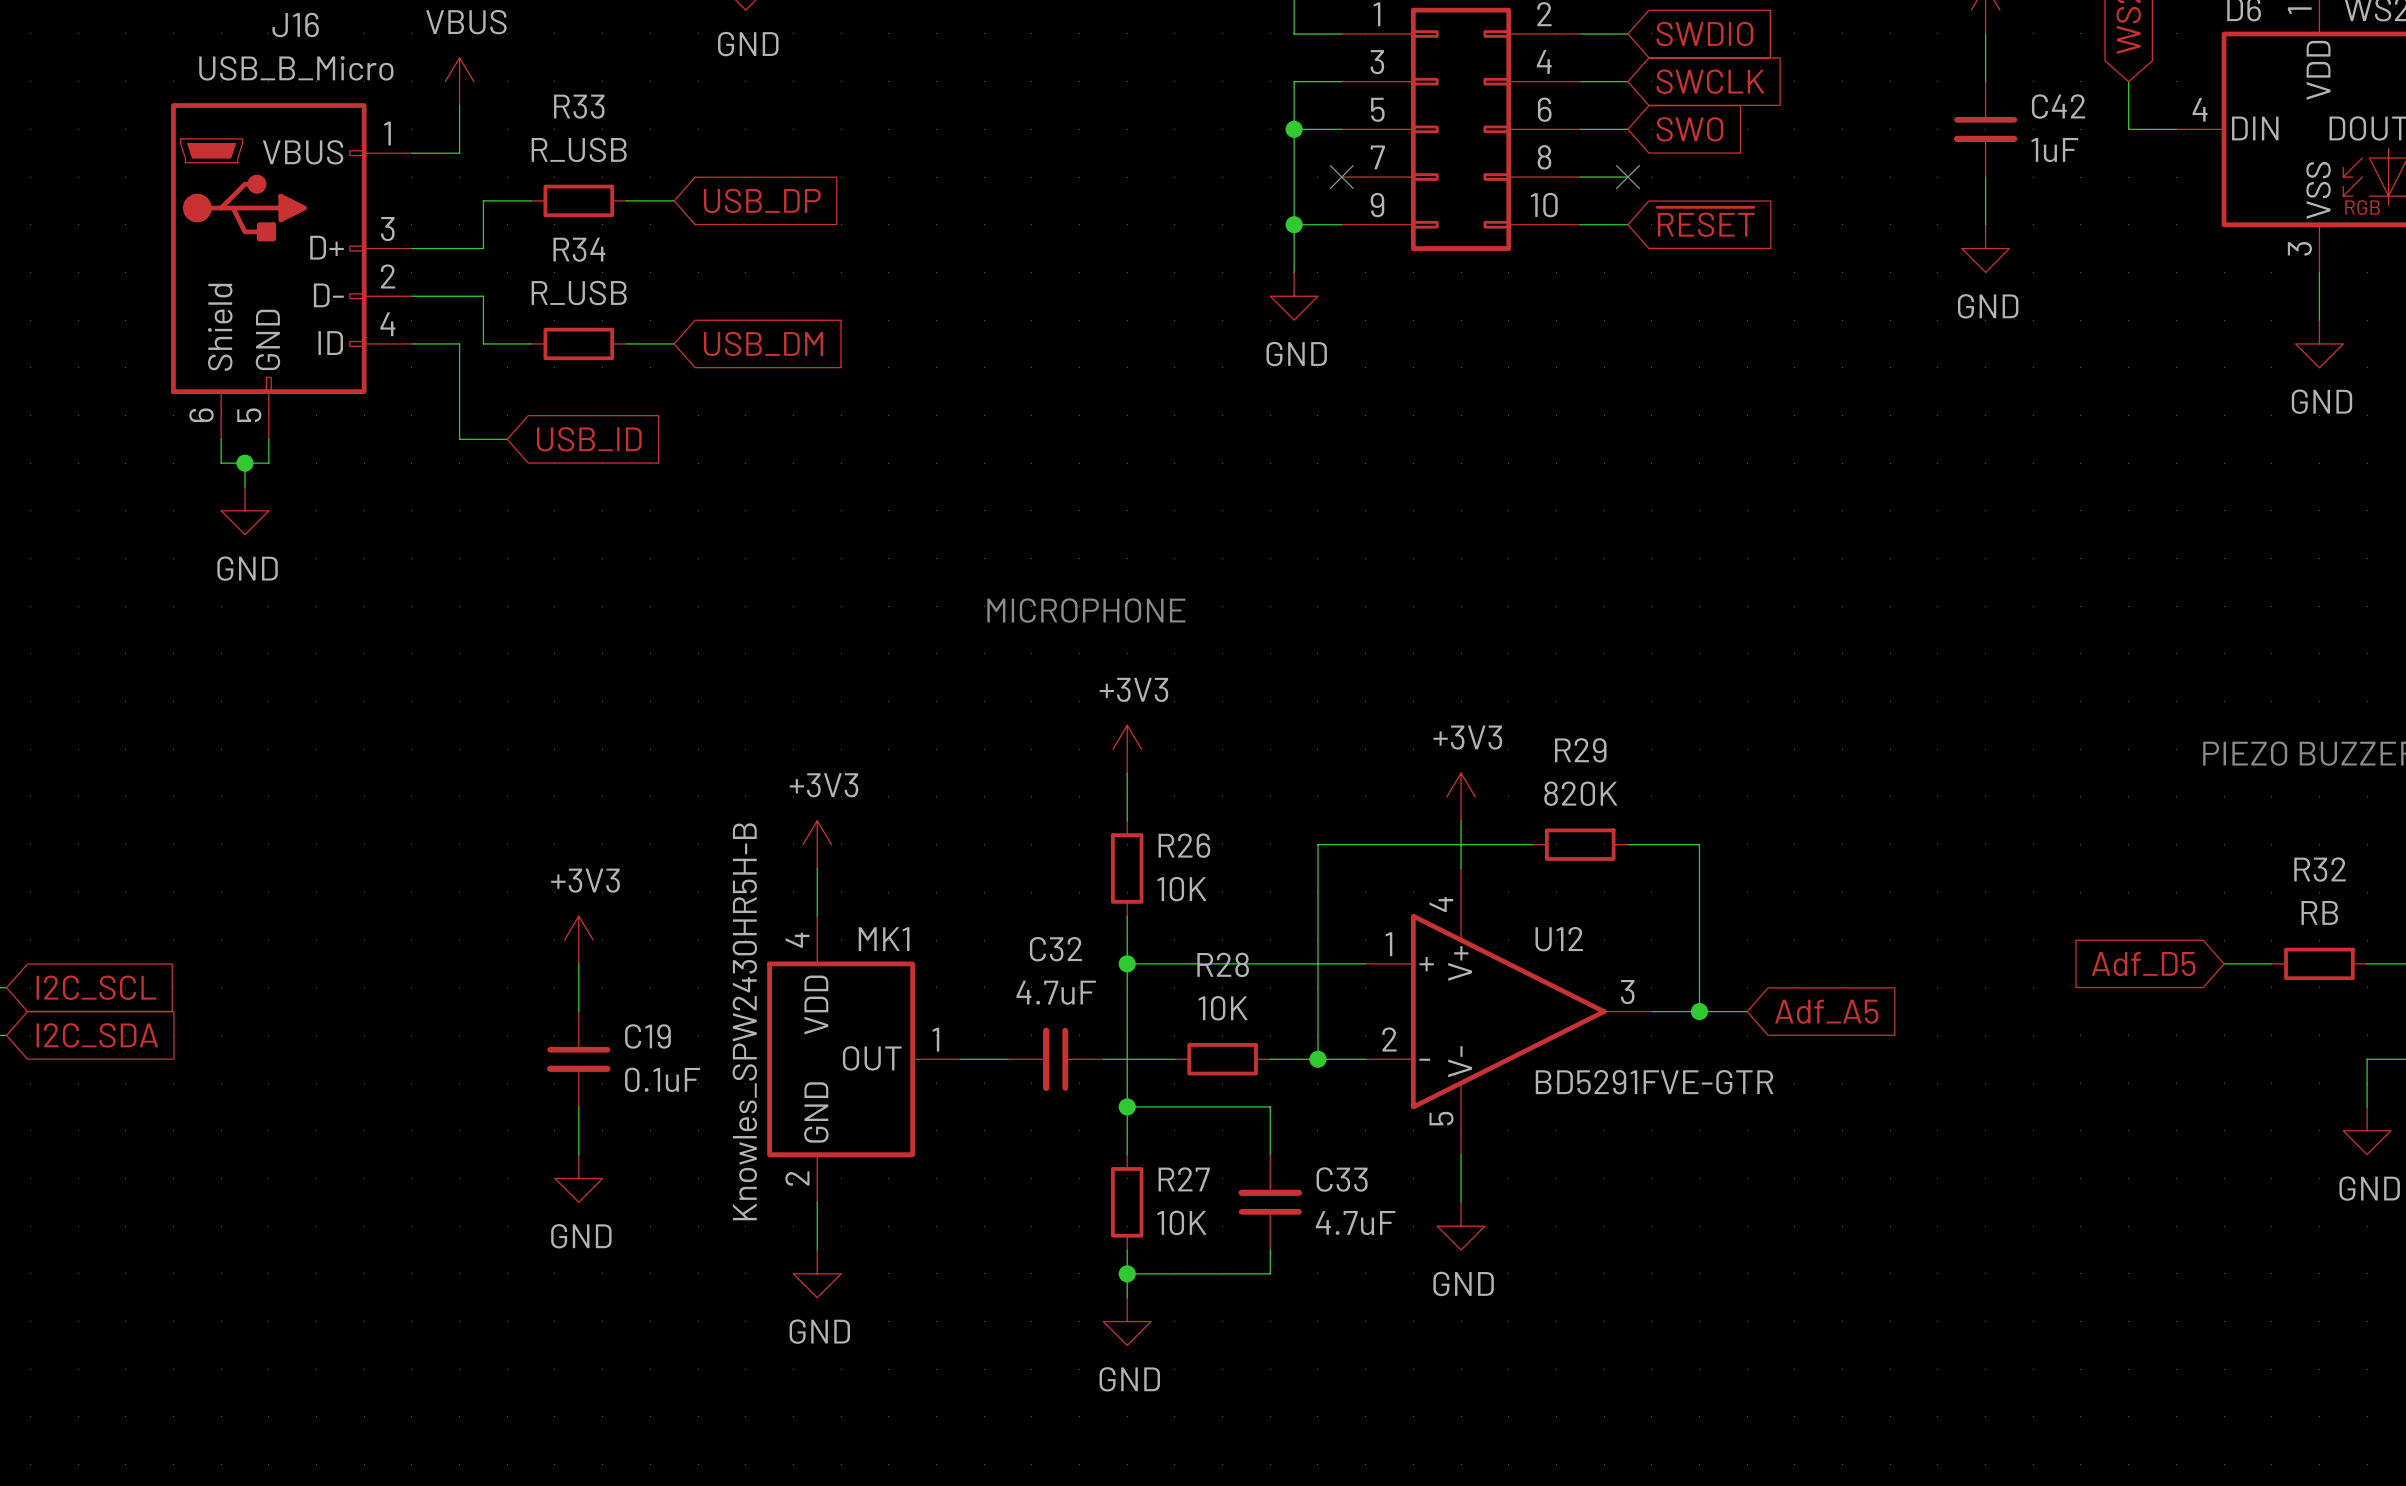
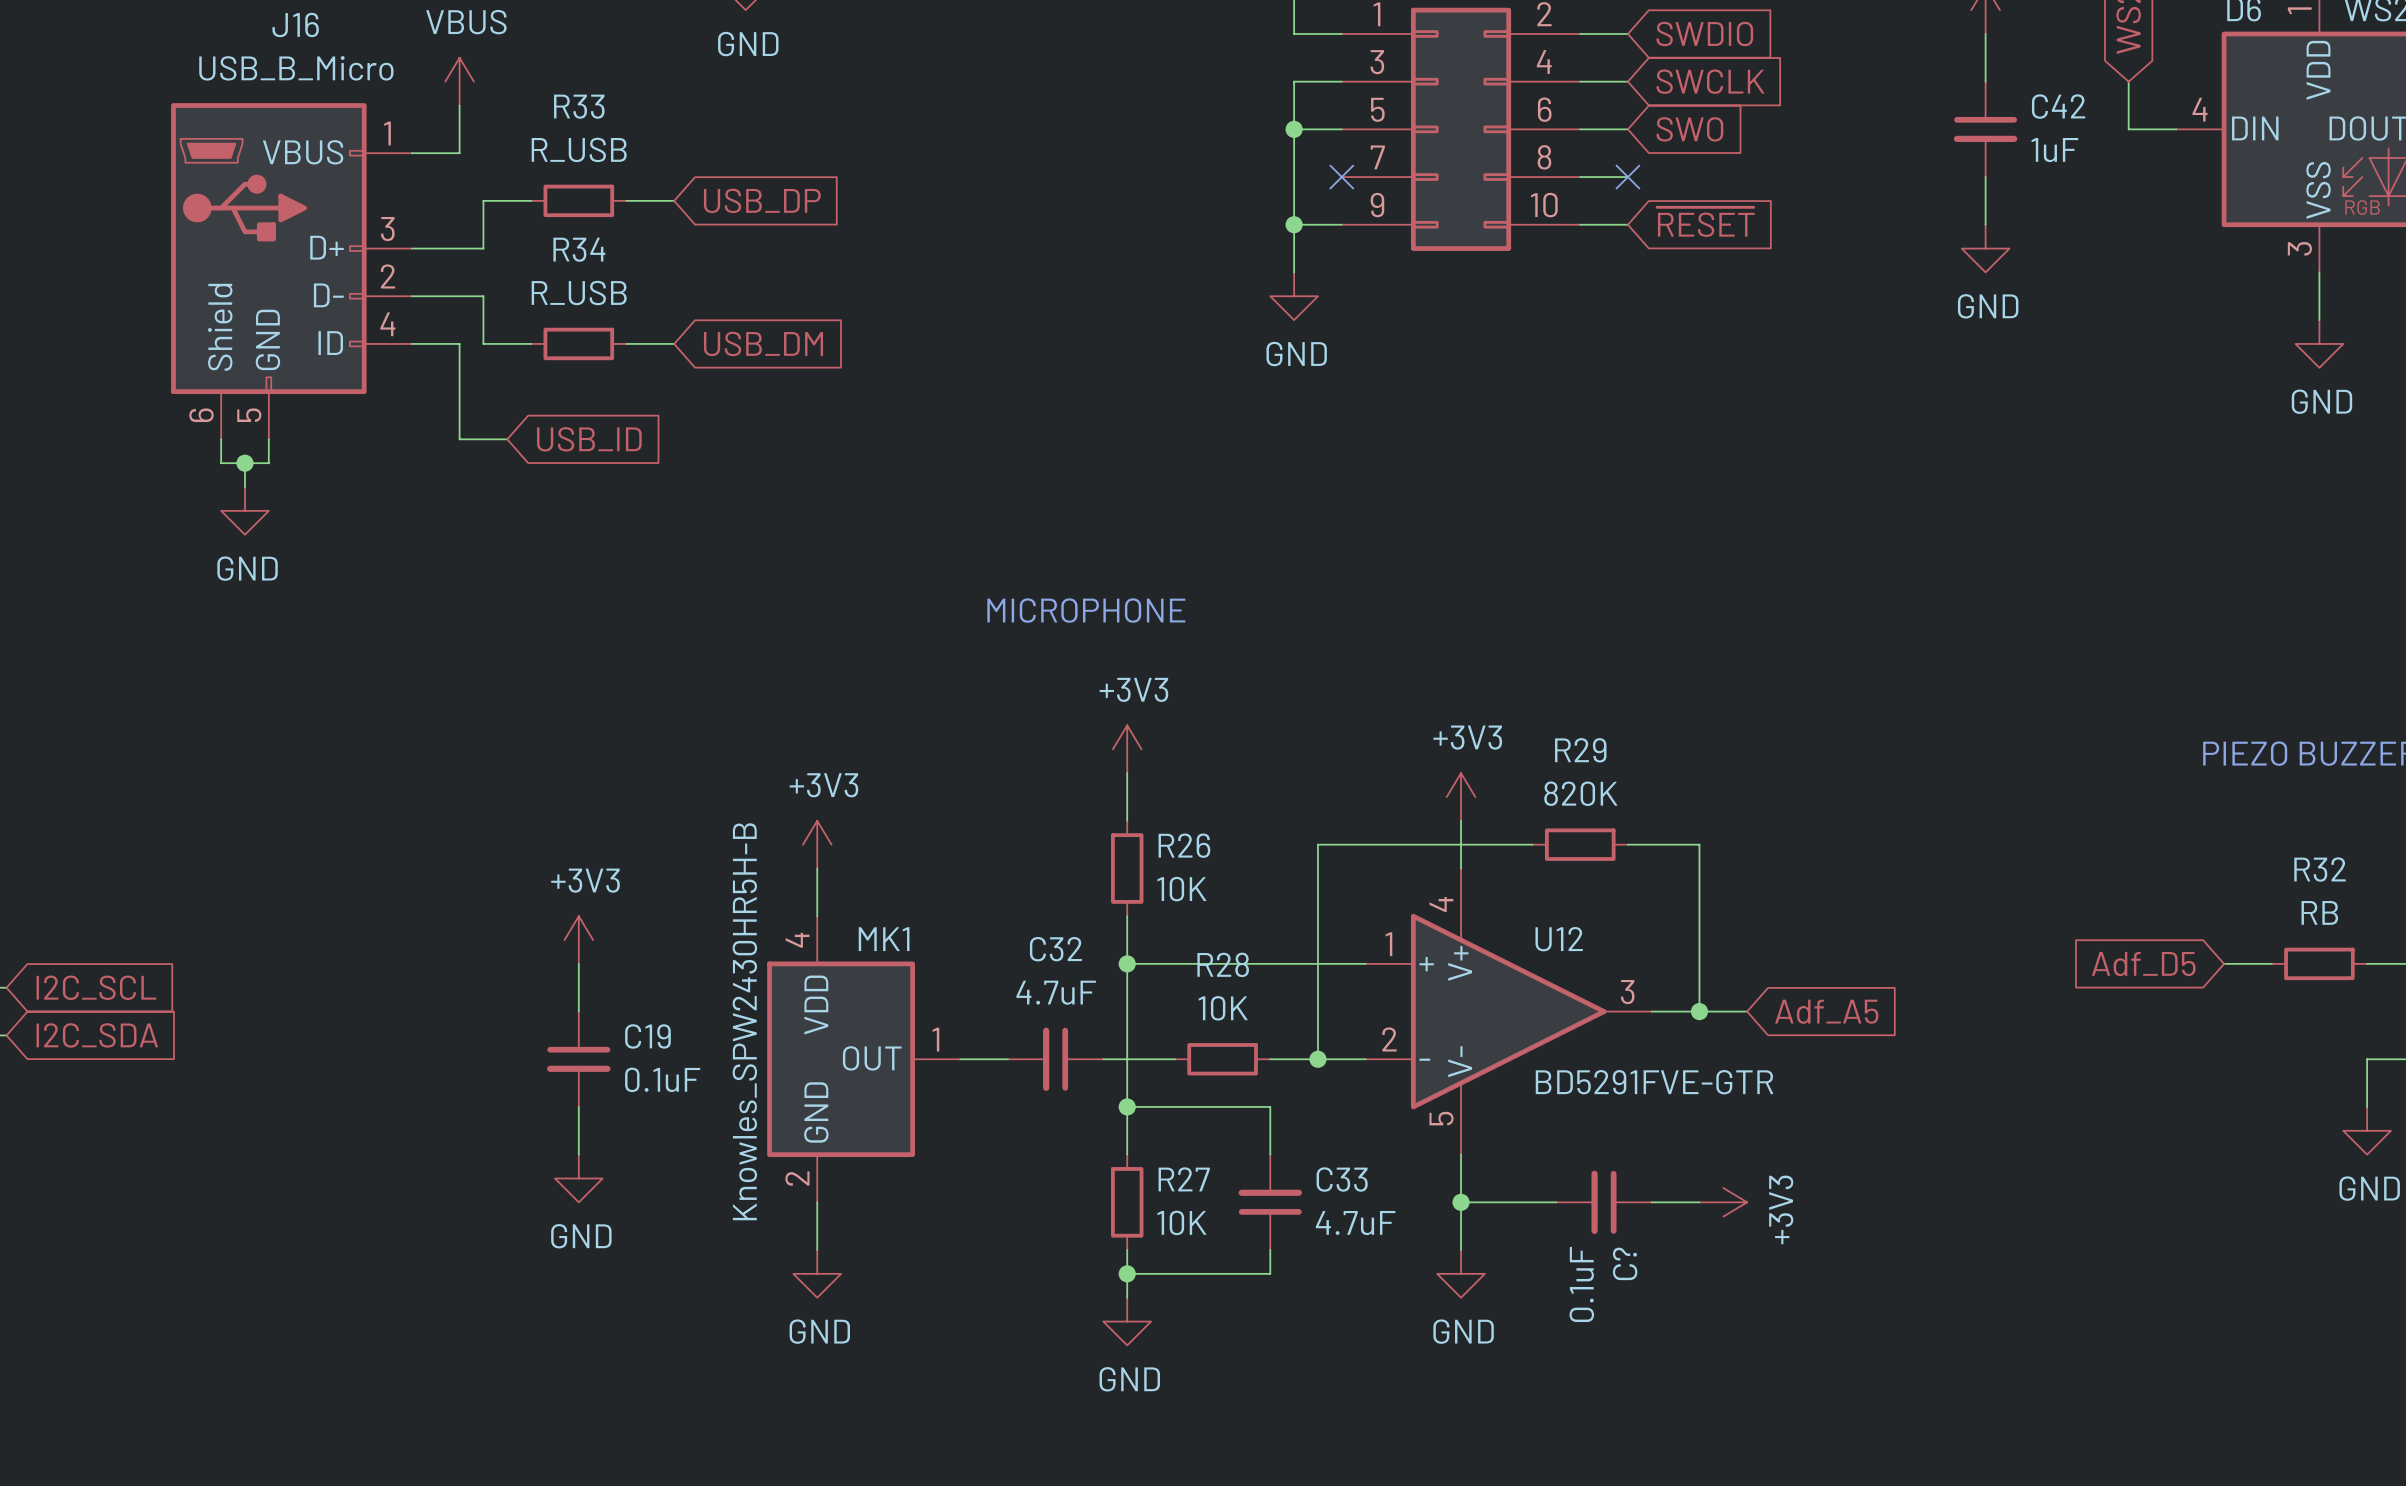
junction: none -> (1461, 1202)
wire: none -> (1556, 1202) (1461, 1202) (1461, 1250)
C?: none -> 0.1uF (1604, 1202)
wire: none -> (1651, 1202) (1699, 1202)
power symbol: none -> +3V3 (1723, 1202)
power symbol position: GND (1461, 1226) -> GND (1461, 1273)

